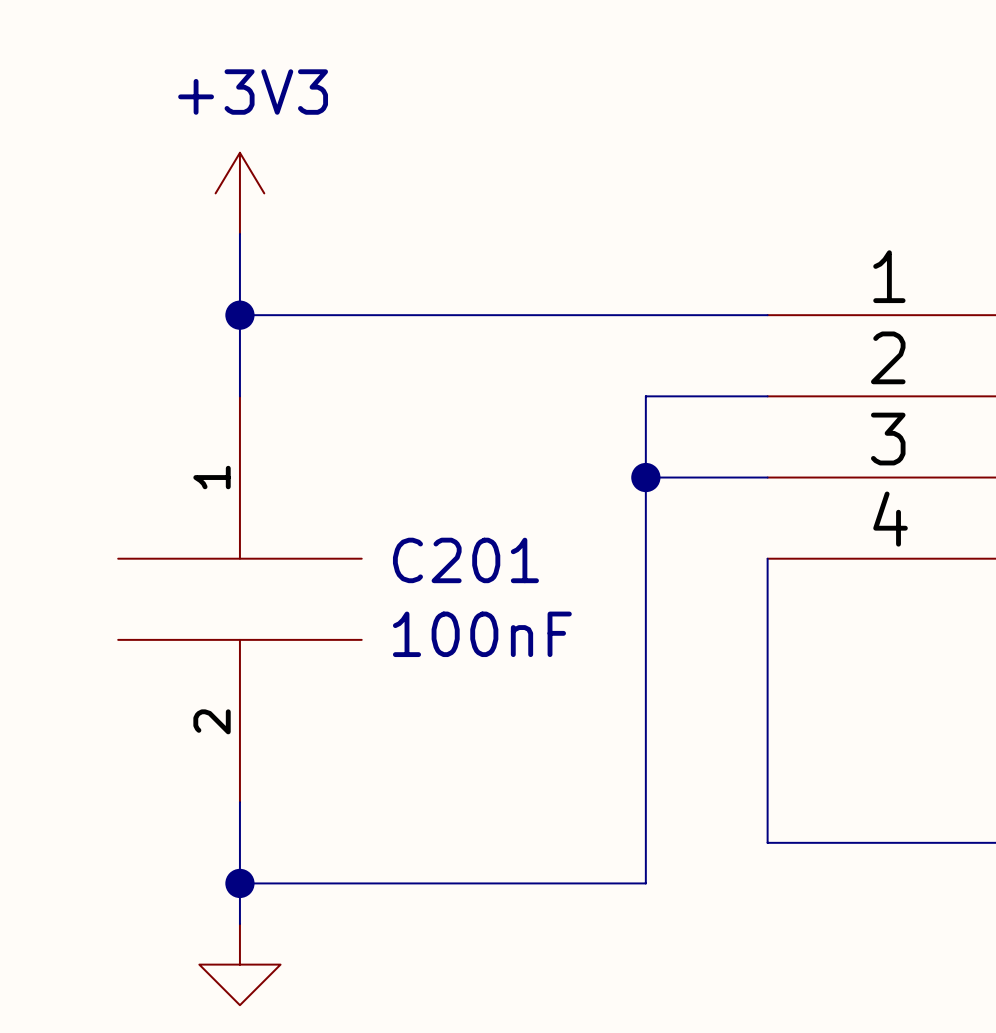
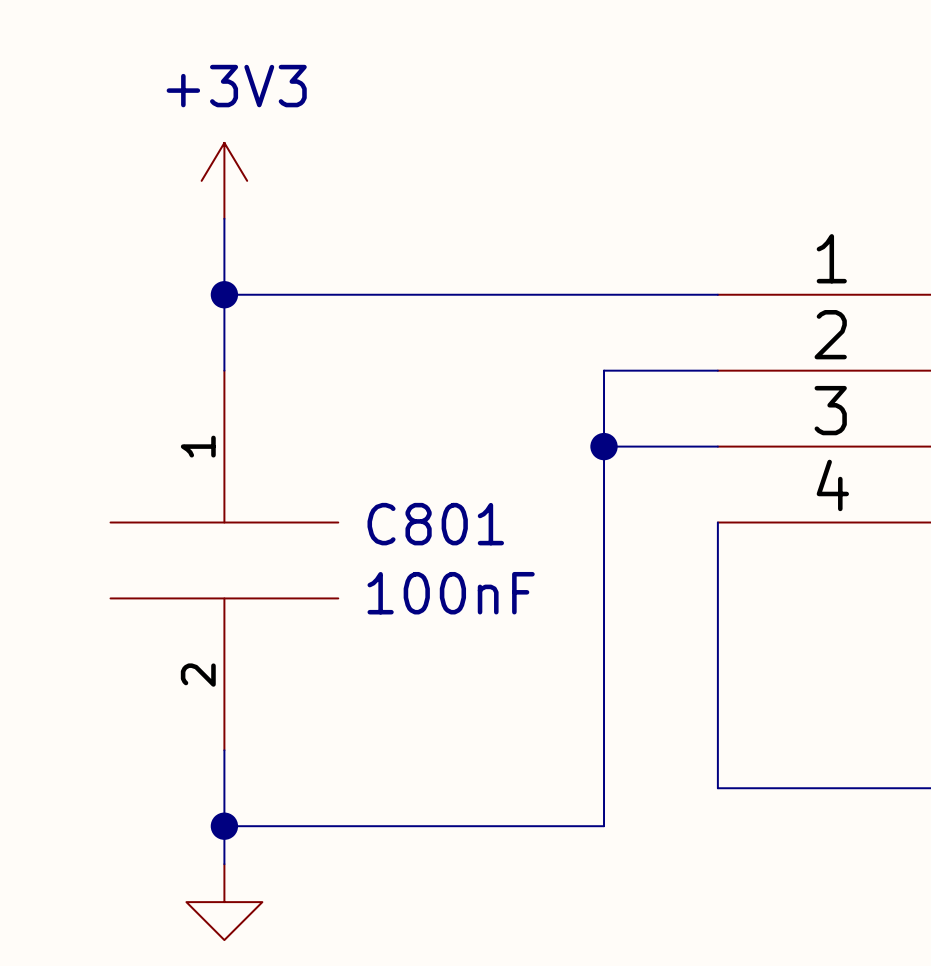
C201 name: C201 (465, 560) -> C801 (435, 524)

